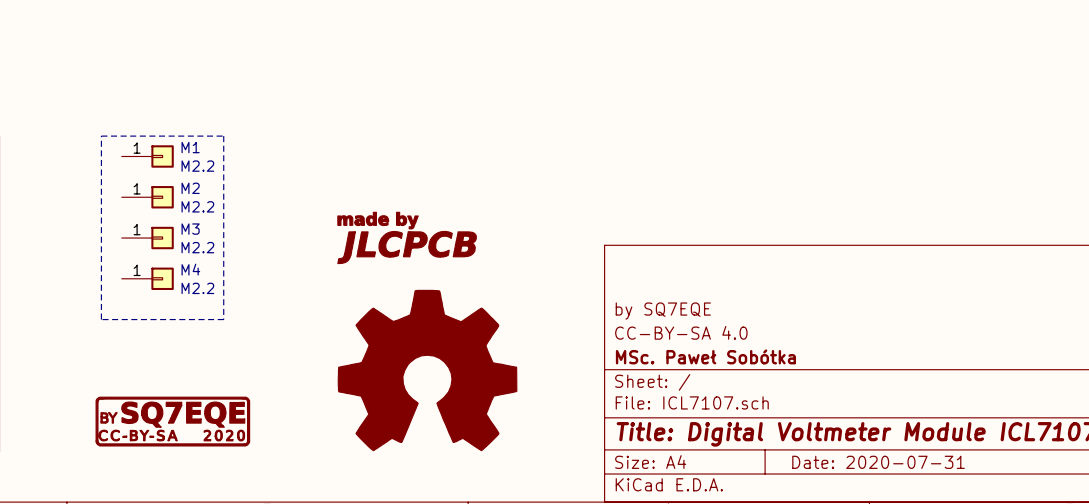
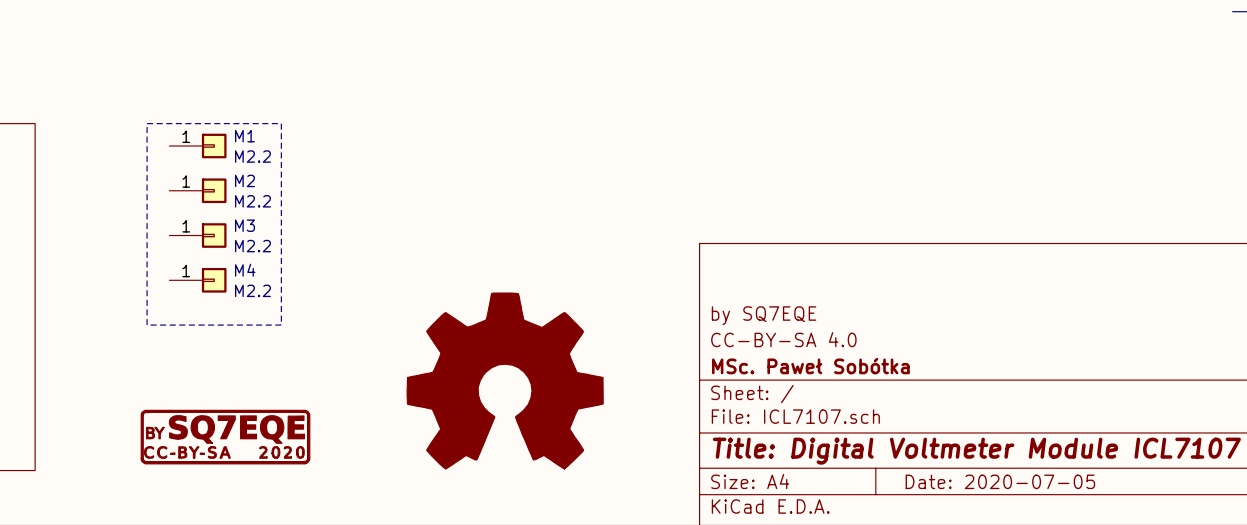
part: (407, 237) -> none
title block: Date: 2020-07-31 (878, 462) -> Date: 2020-07-05 (1000, 481)

